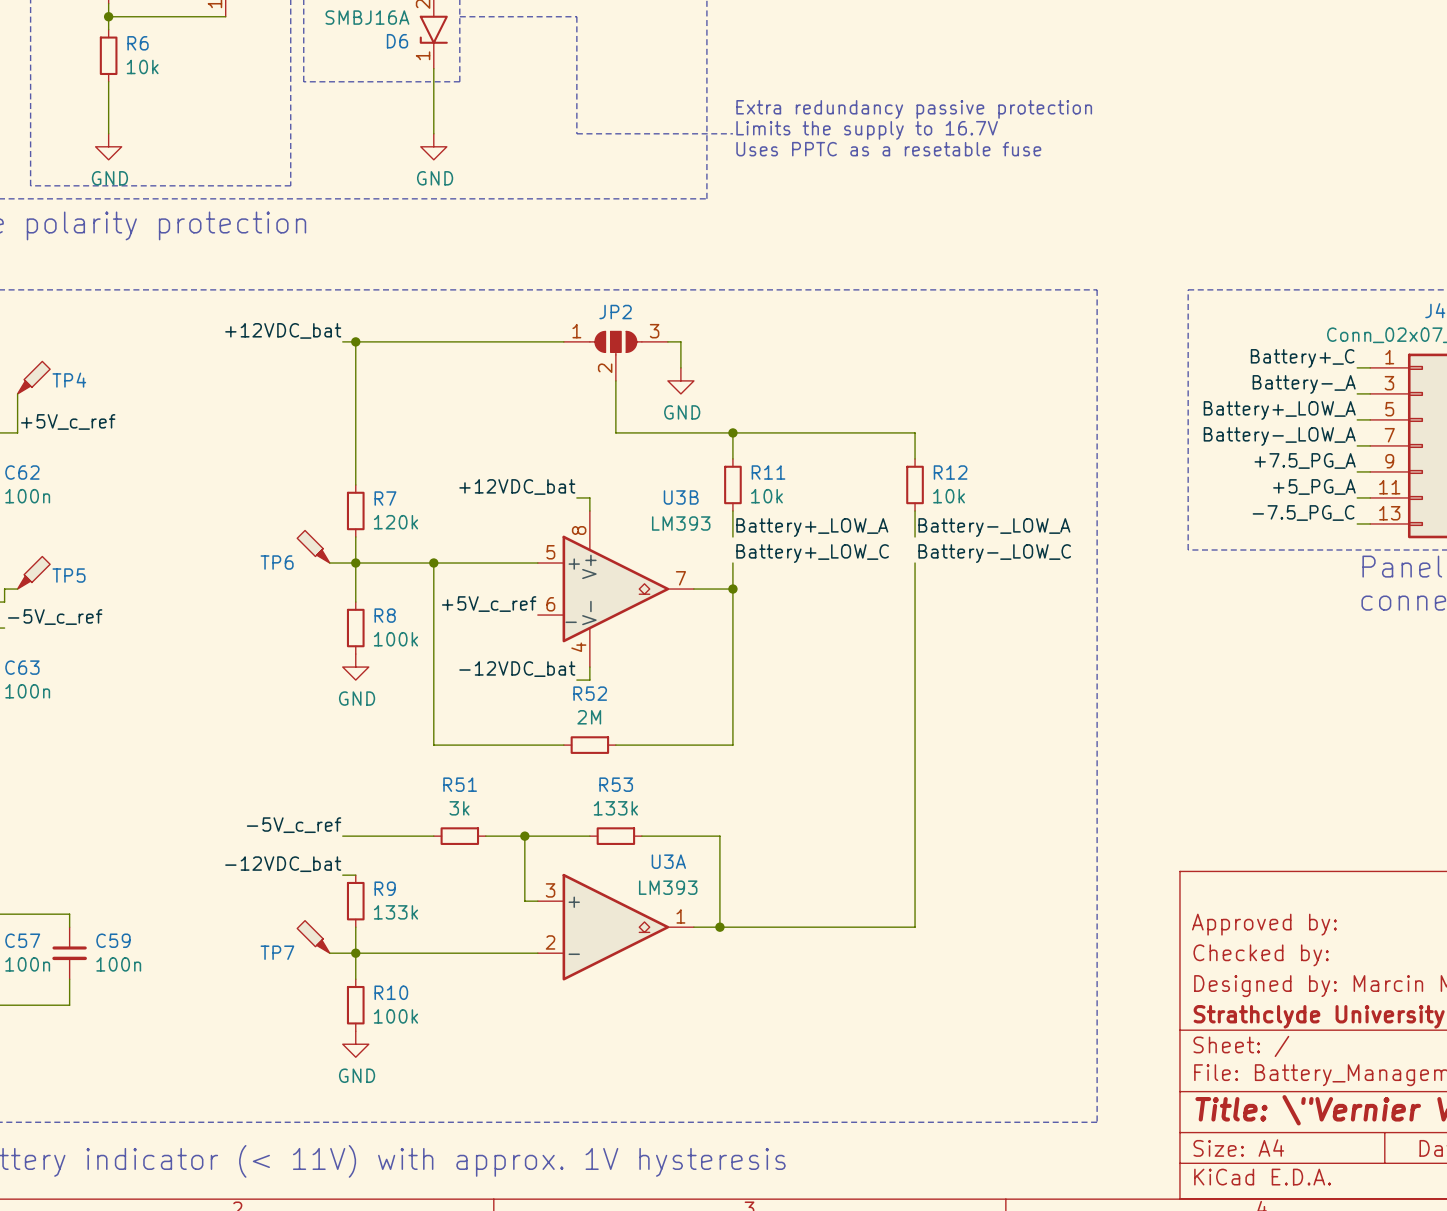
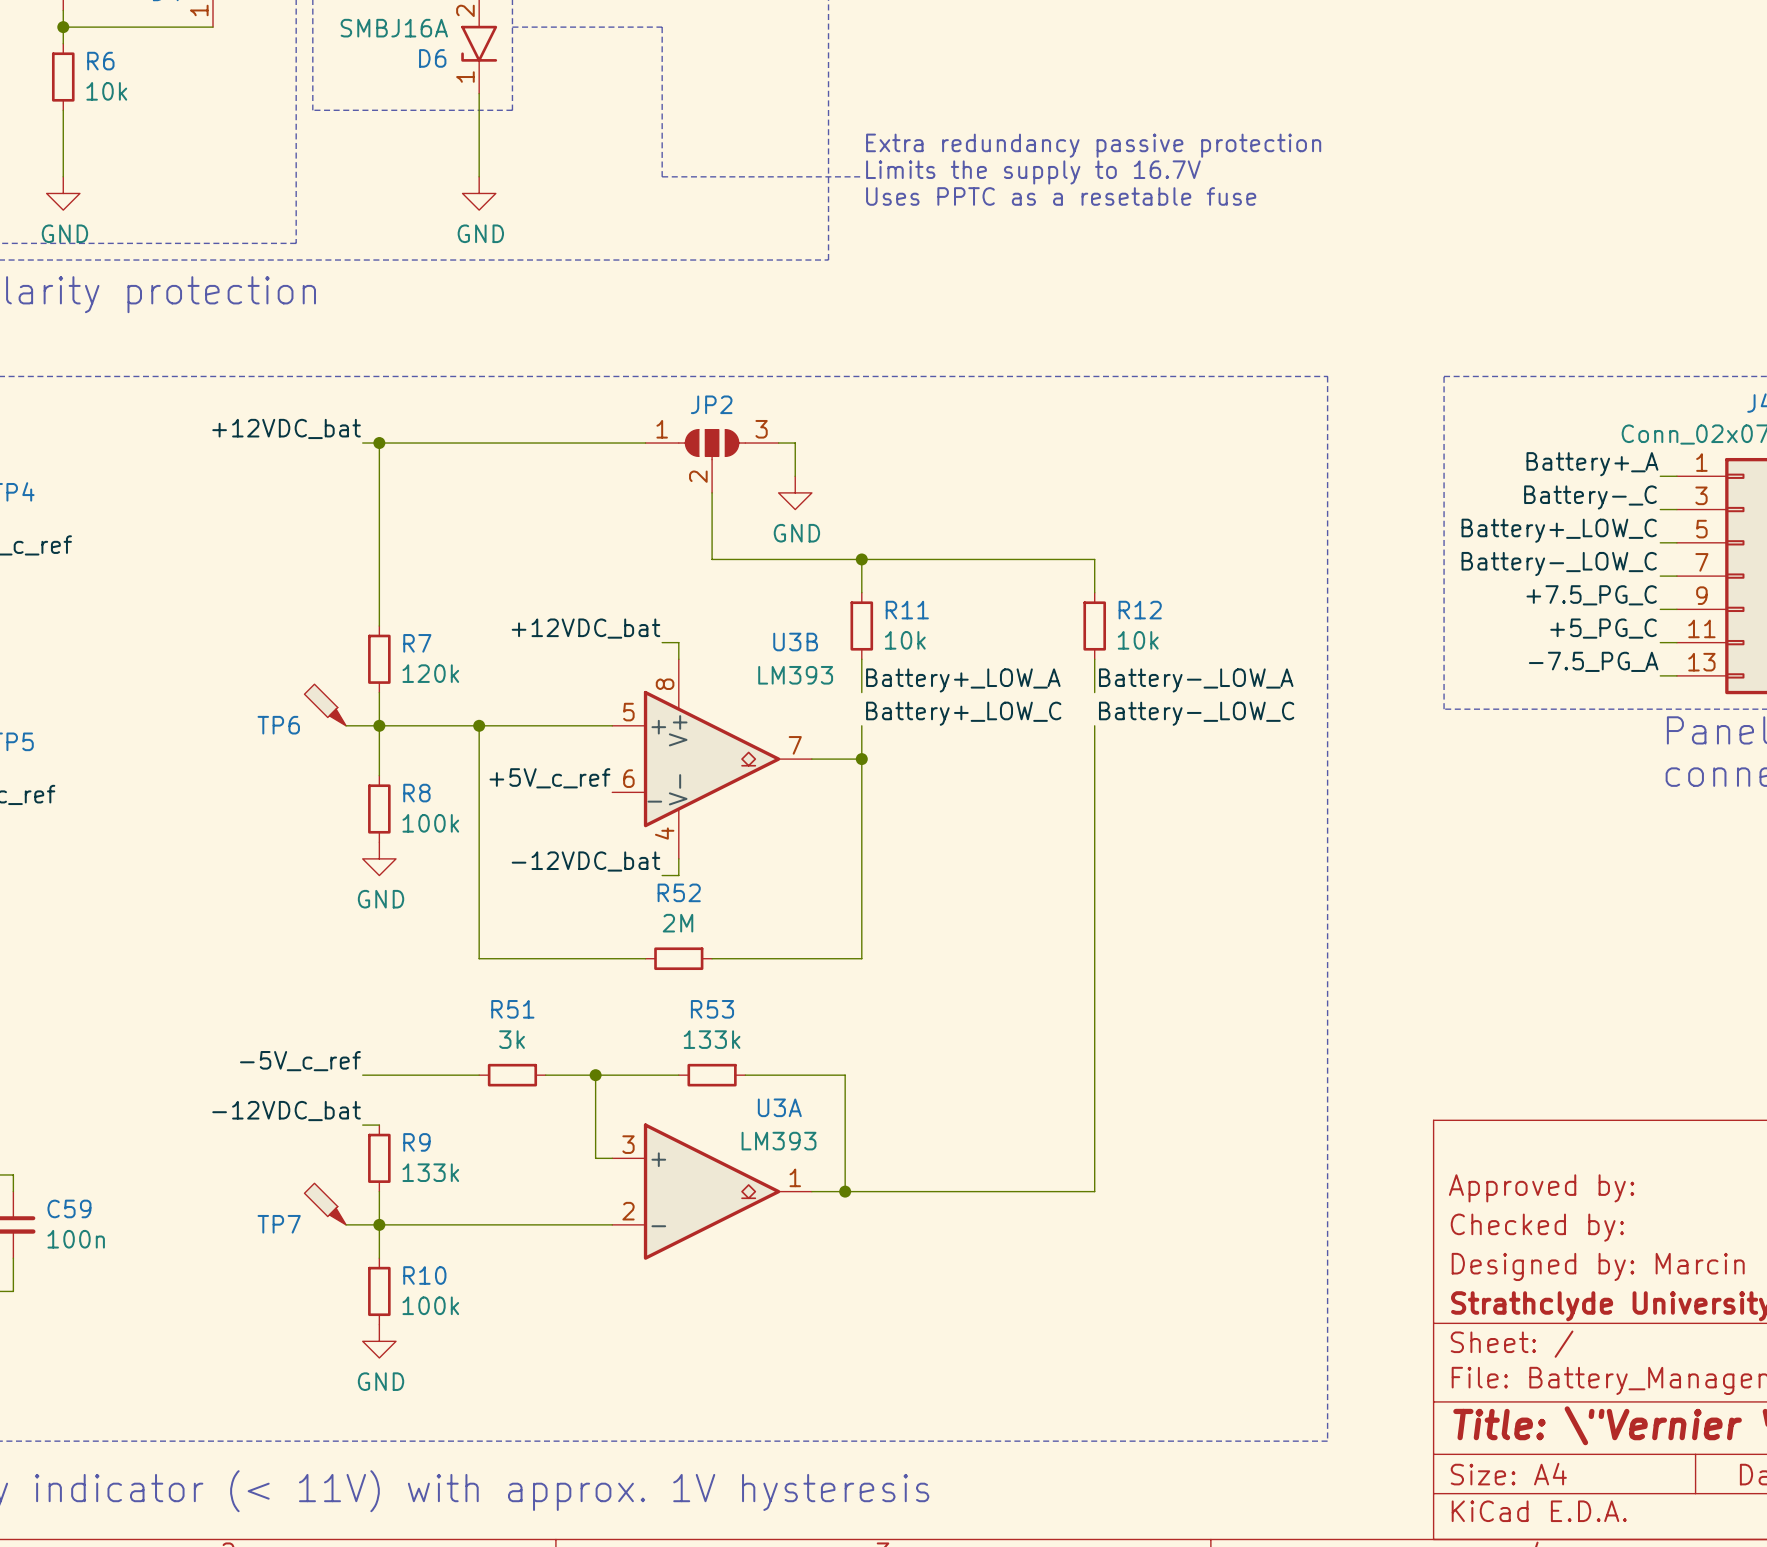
label: Battery+_C (1302, 358) -> Battery+_A (1592, 464)
label: Battery-_A (1304, 384) -> Battery-_C (1590, 497)
label: Battery+_LOW_A (1279, 410) -> Battery+_LOW_C (1559, 530)
label: Battery-_LOW_A (1279, 436) -> Battery-_LOW_C (1559, 564)
label: +7.5_PG_A (1305, 460) -> +7.5_PG_C (1591, 595)
label: +5_PG_A (1314, 486) -> +5_PG_C (1603, 628)
label: -7.5_PG_C (1303, 513) -> -7.5_PG_A (1593, 661)

